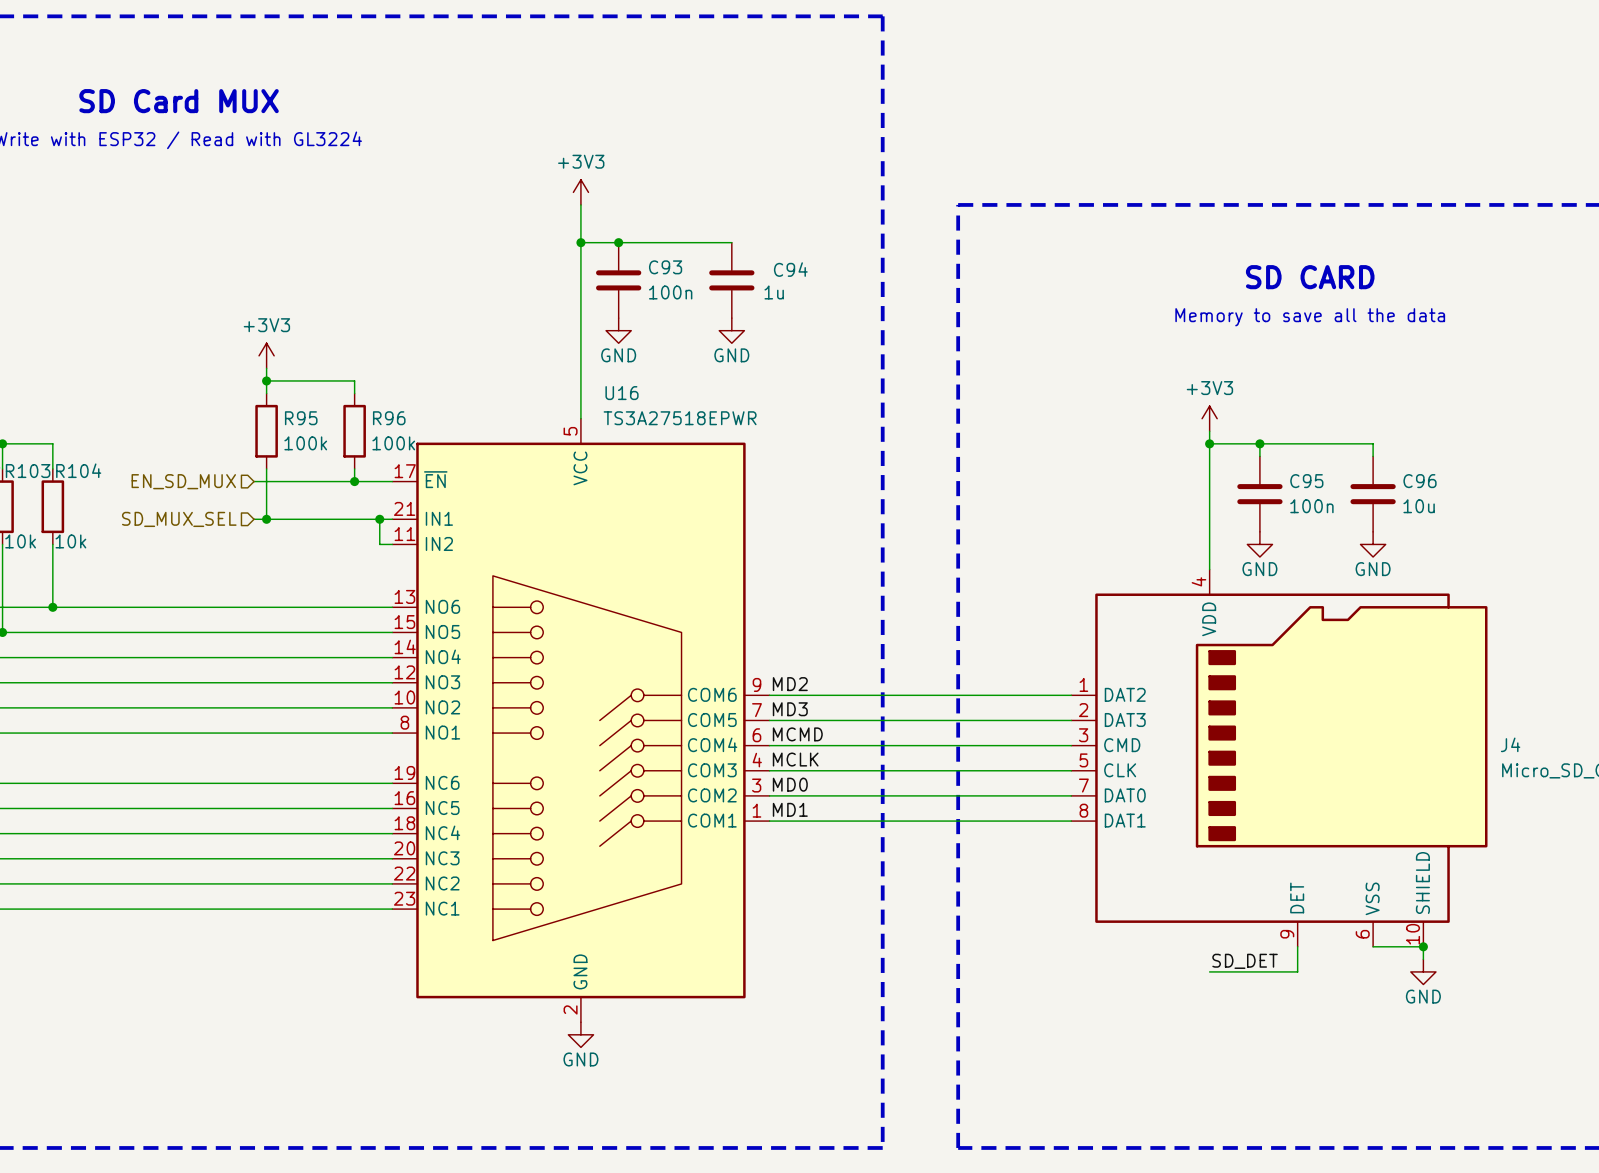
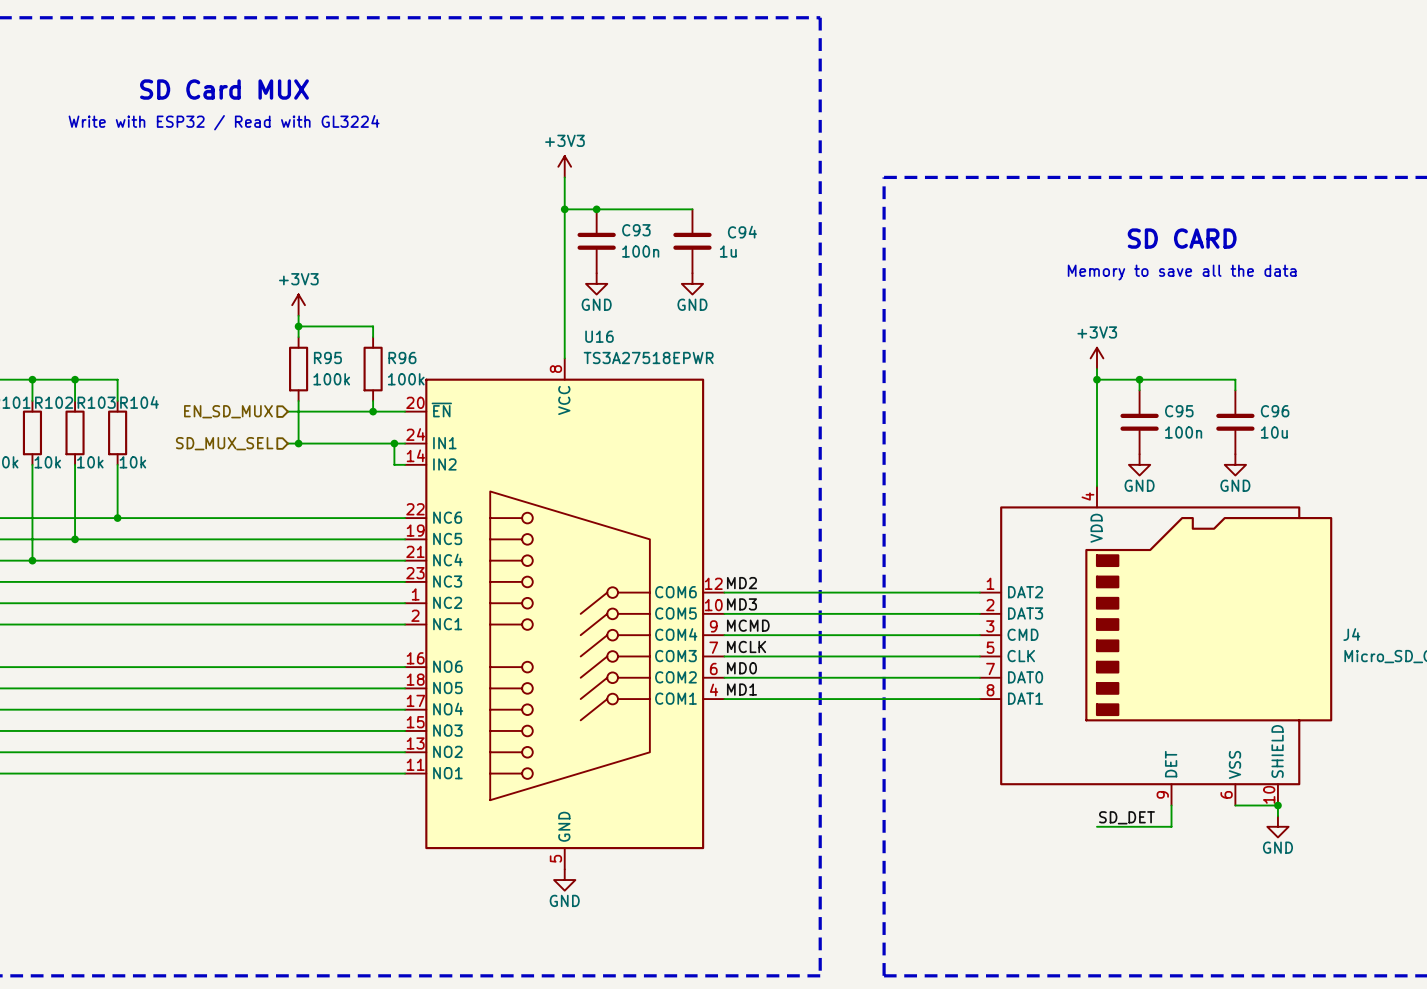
U16 symbol: [392, 418, 770, 1023] -> [405, 358, 725, 870]

